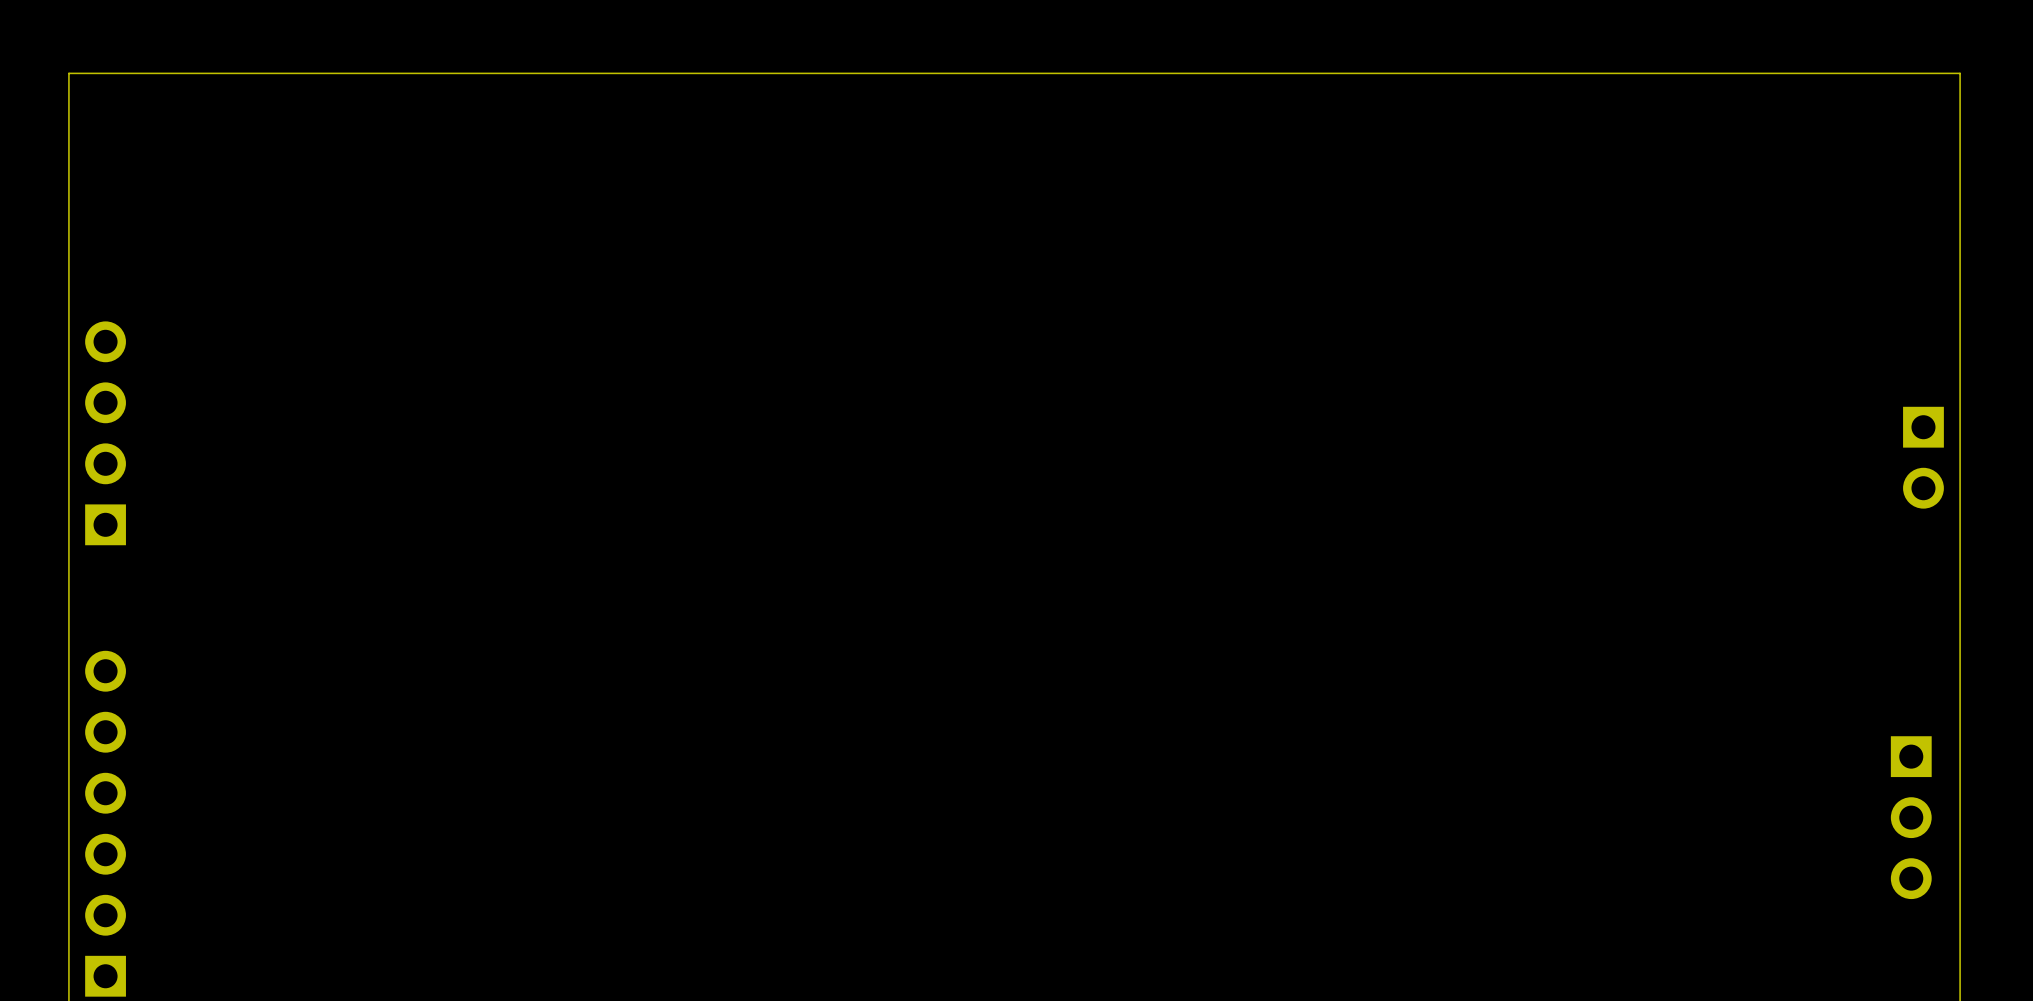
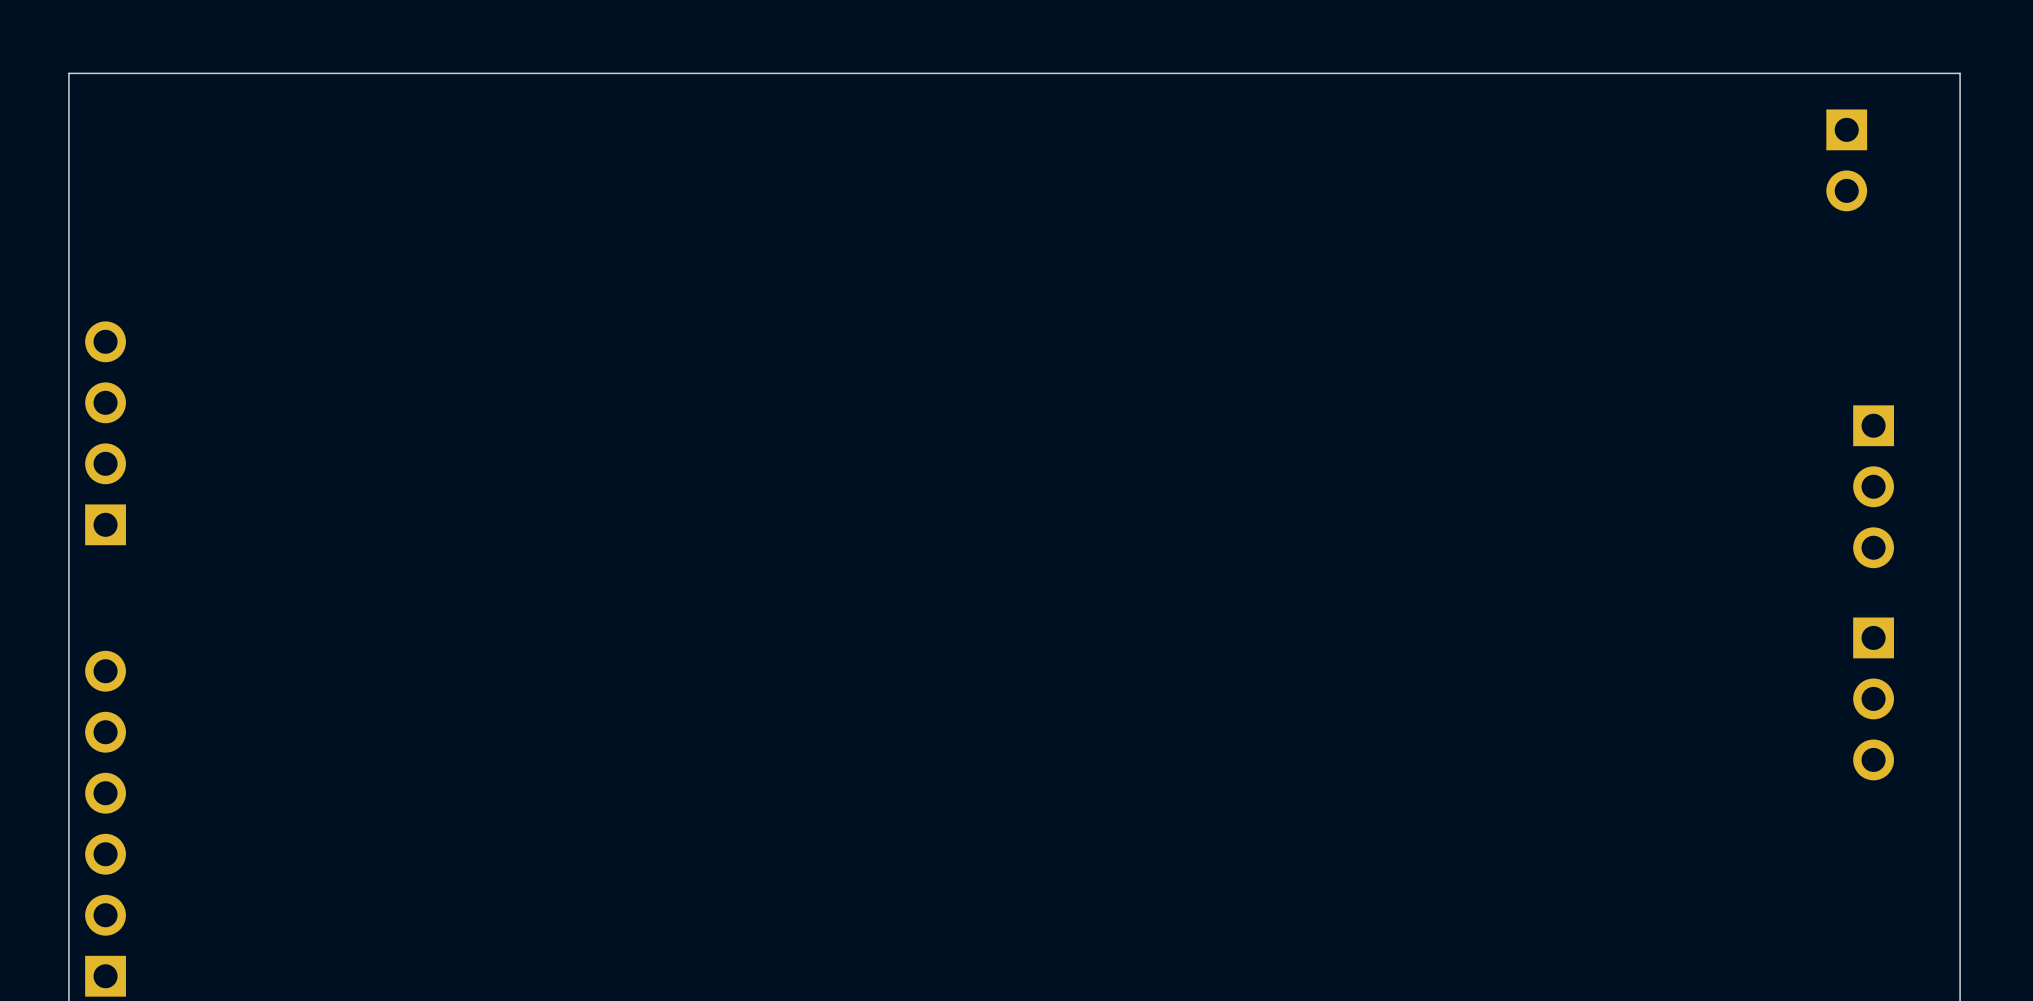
part position: (1923, 457) -> (1846, 160)
part: none -> (1873, 486)
part position: (1911, 817) -> (1873, 698)

